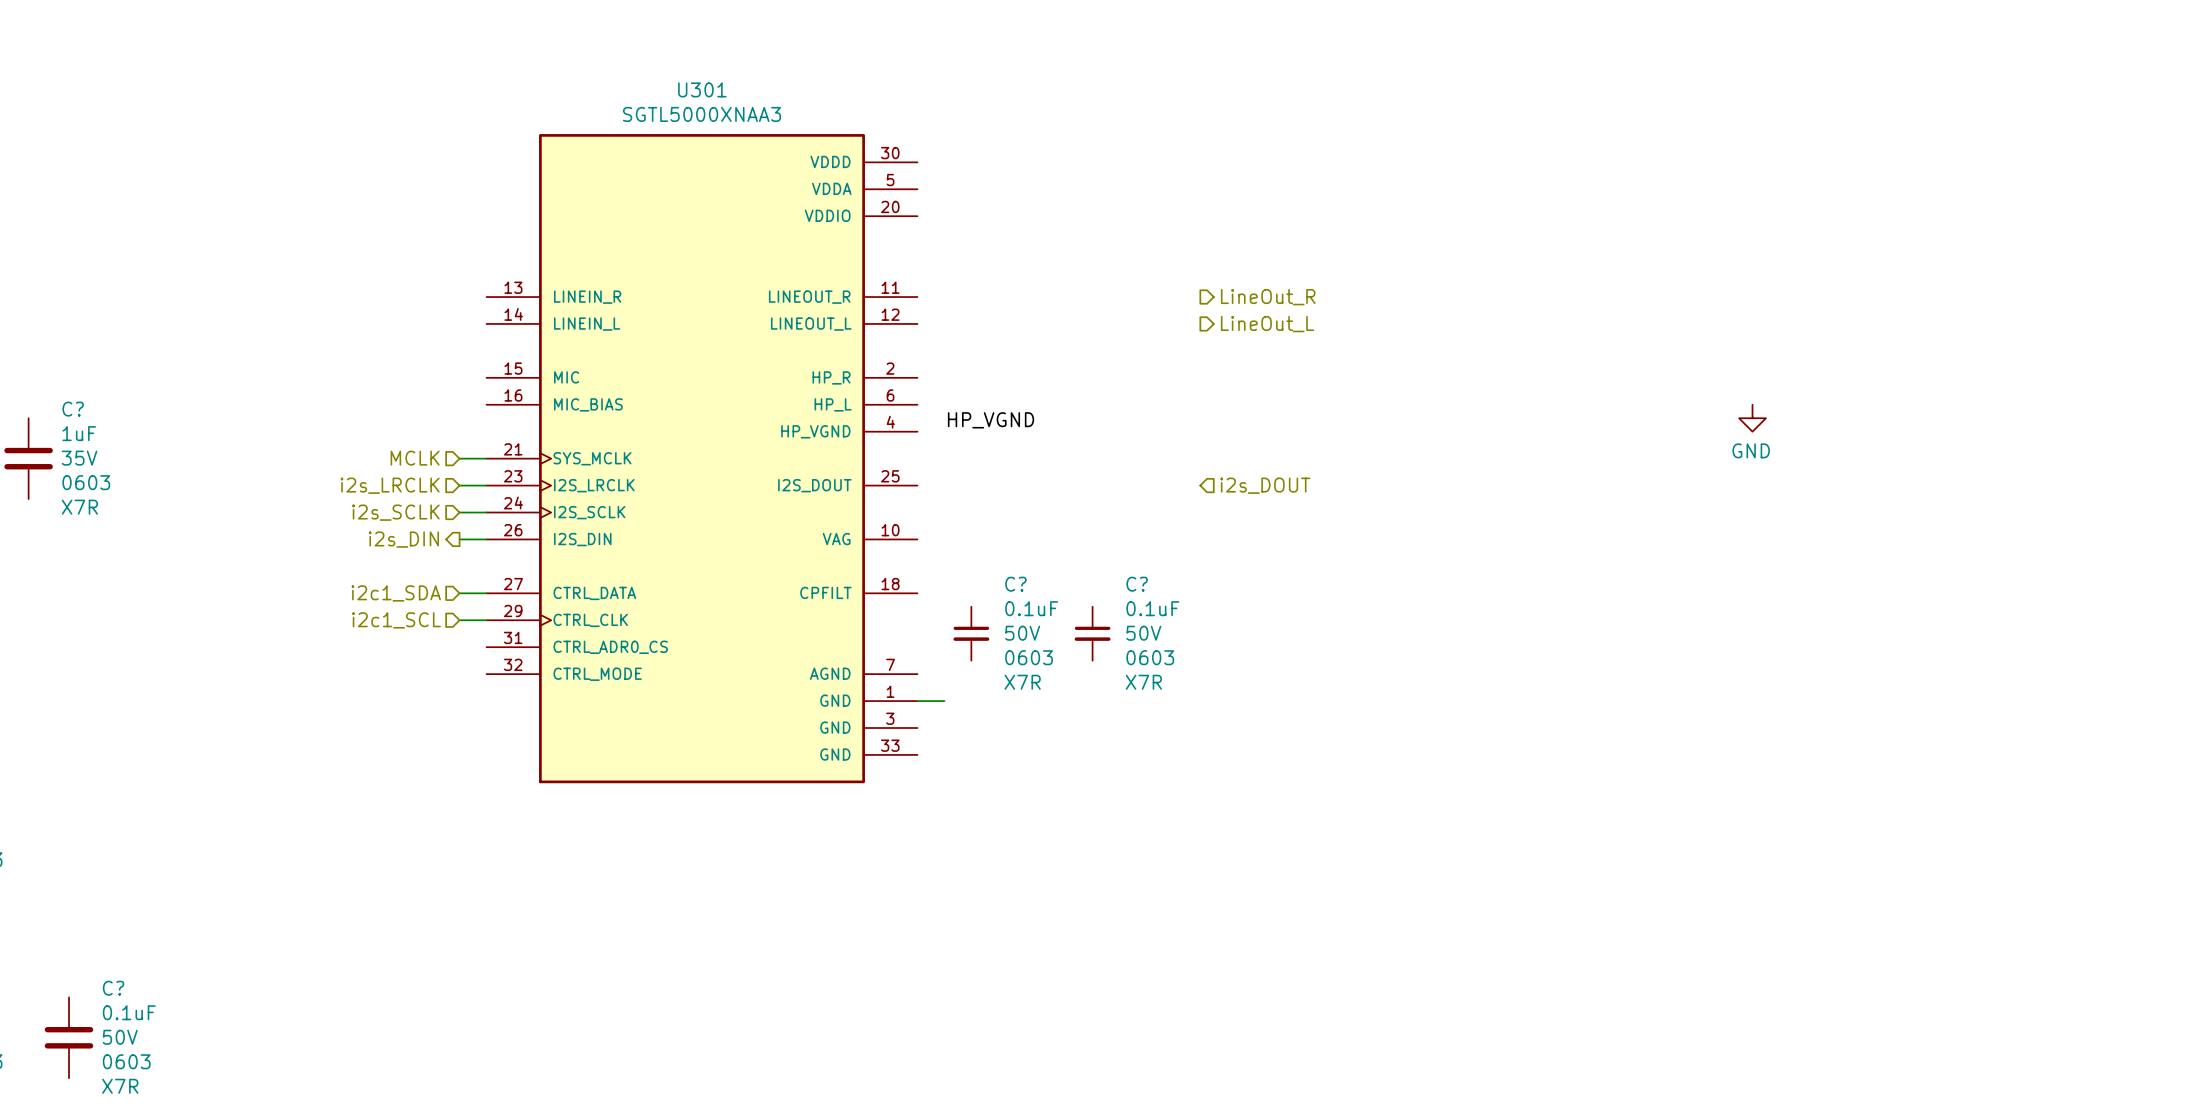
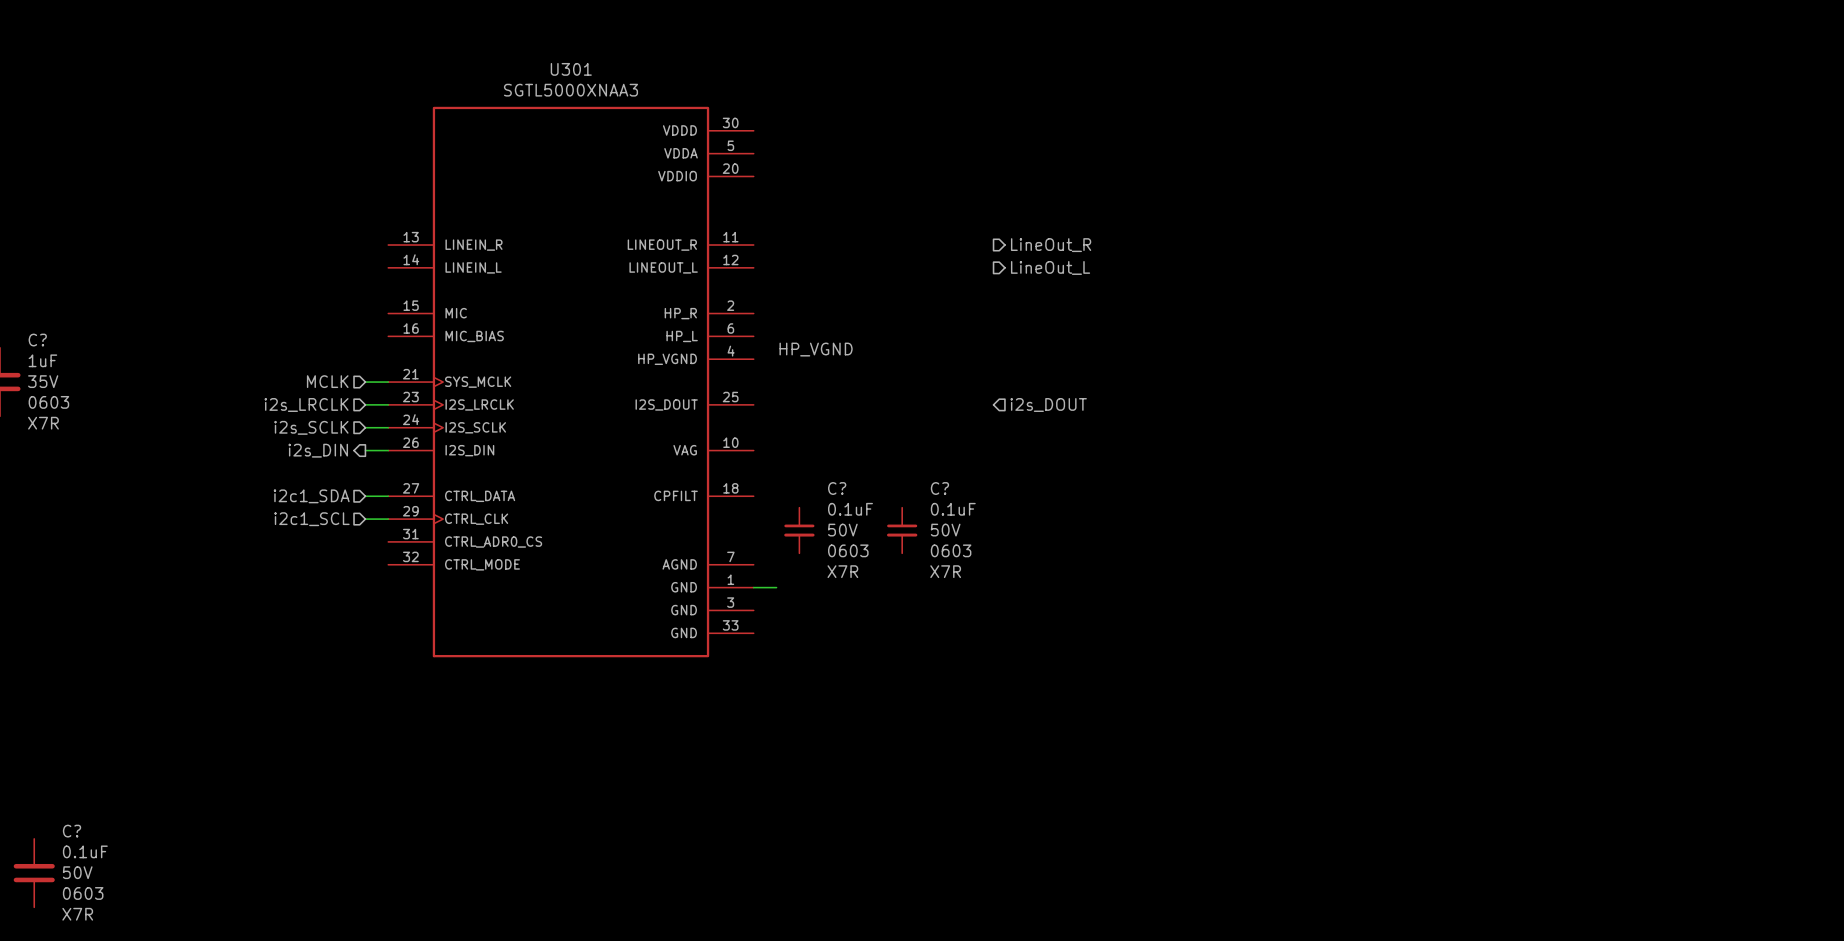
power symbol: GND (1752, 418) -> none

